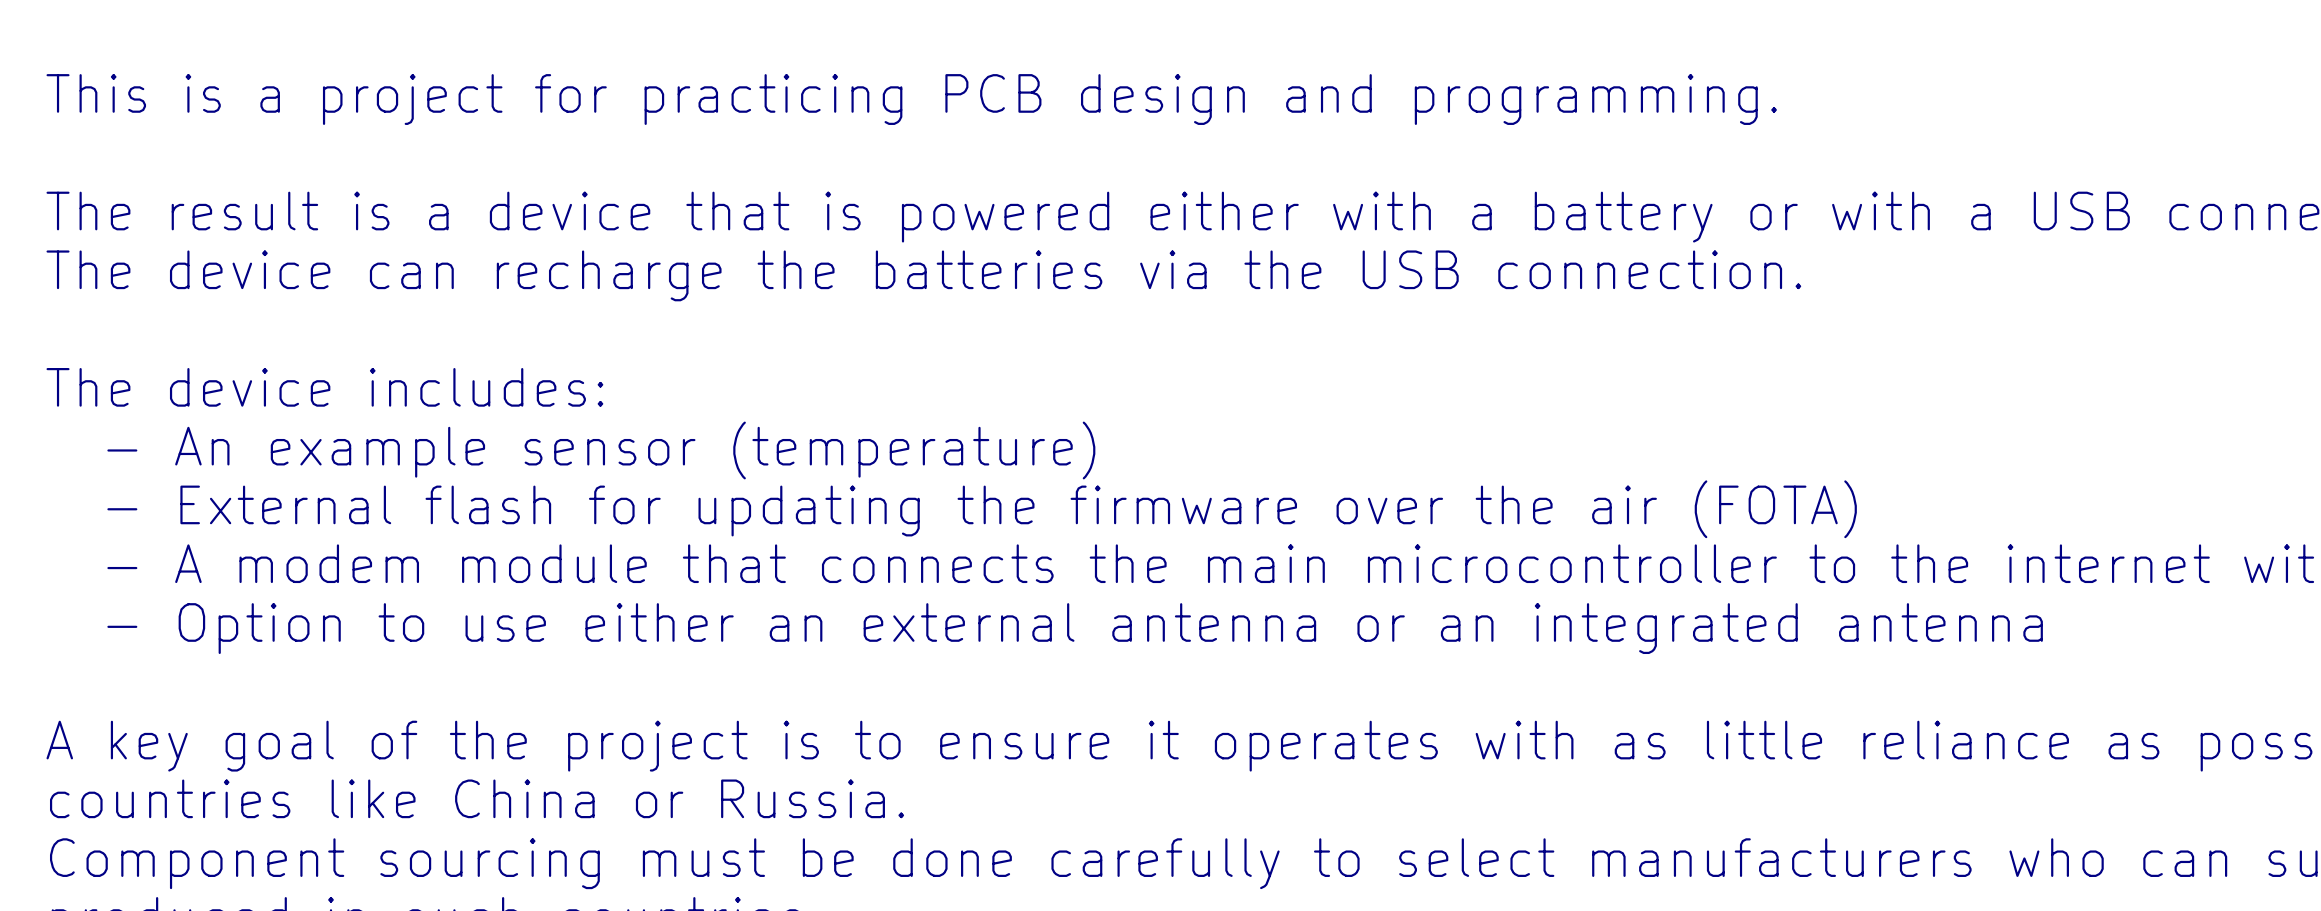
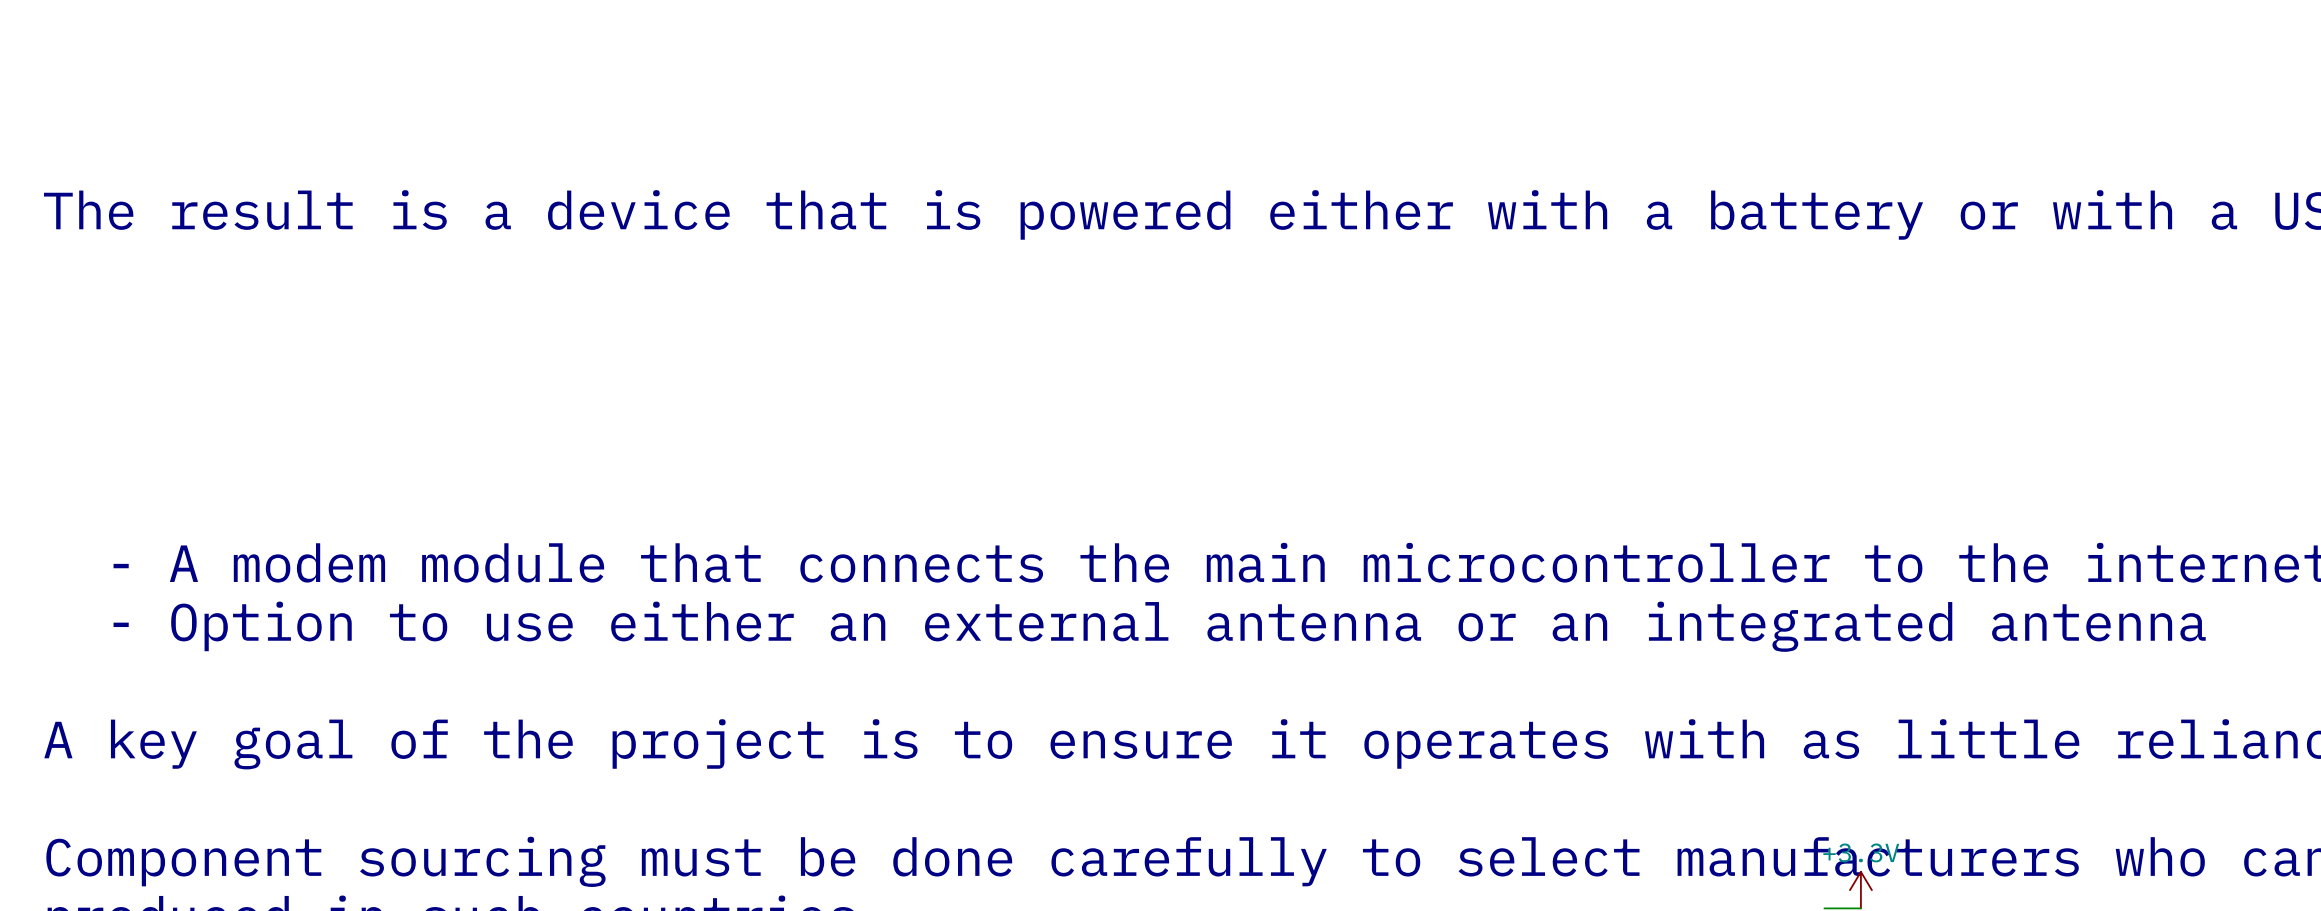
text: This is a project for practicing PCB design and programming. (911, 99) -> none
text: The device can recharge the batteries via the USB connection. (923, 275) -> none
text: The device includes: (324, 387) -> none
text: - An example sensor (temperature) (601, 450) -> none
text: - External flash for updating the firmware over the air (FOTA) (982, 509) -> none
text: countries like China or Russia. (477, 798) -> none
power symbol: none -> +3.3V (1860, 890)
wire: none -> (1824, 908) (1860, 908)

